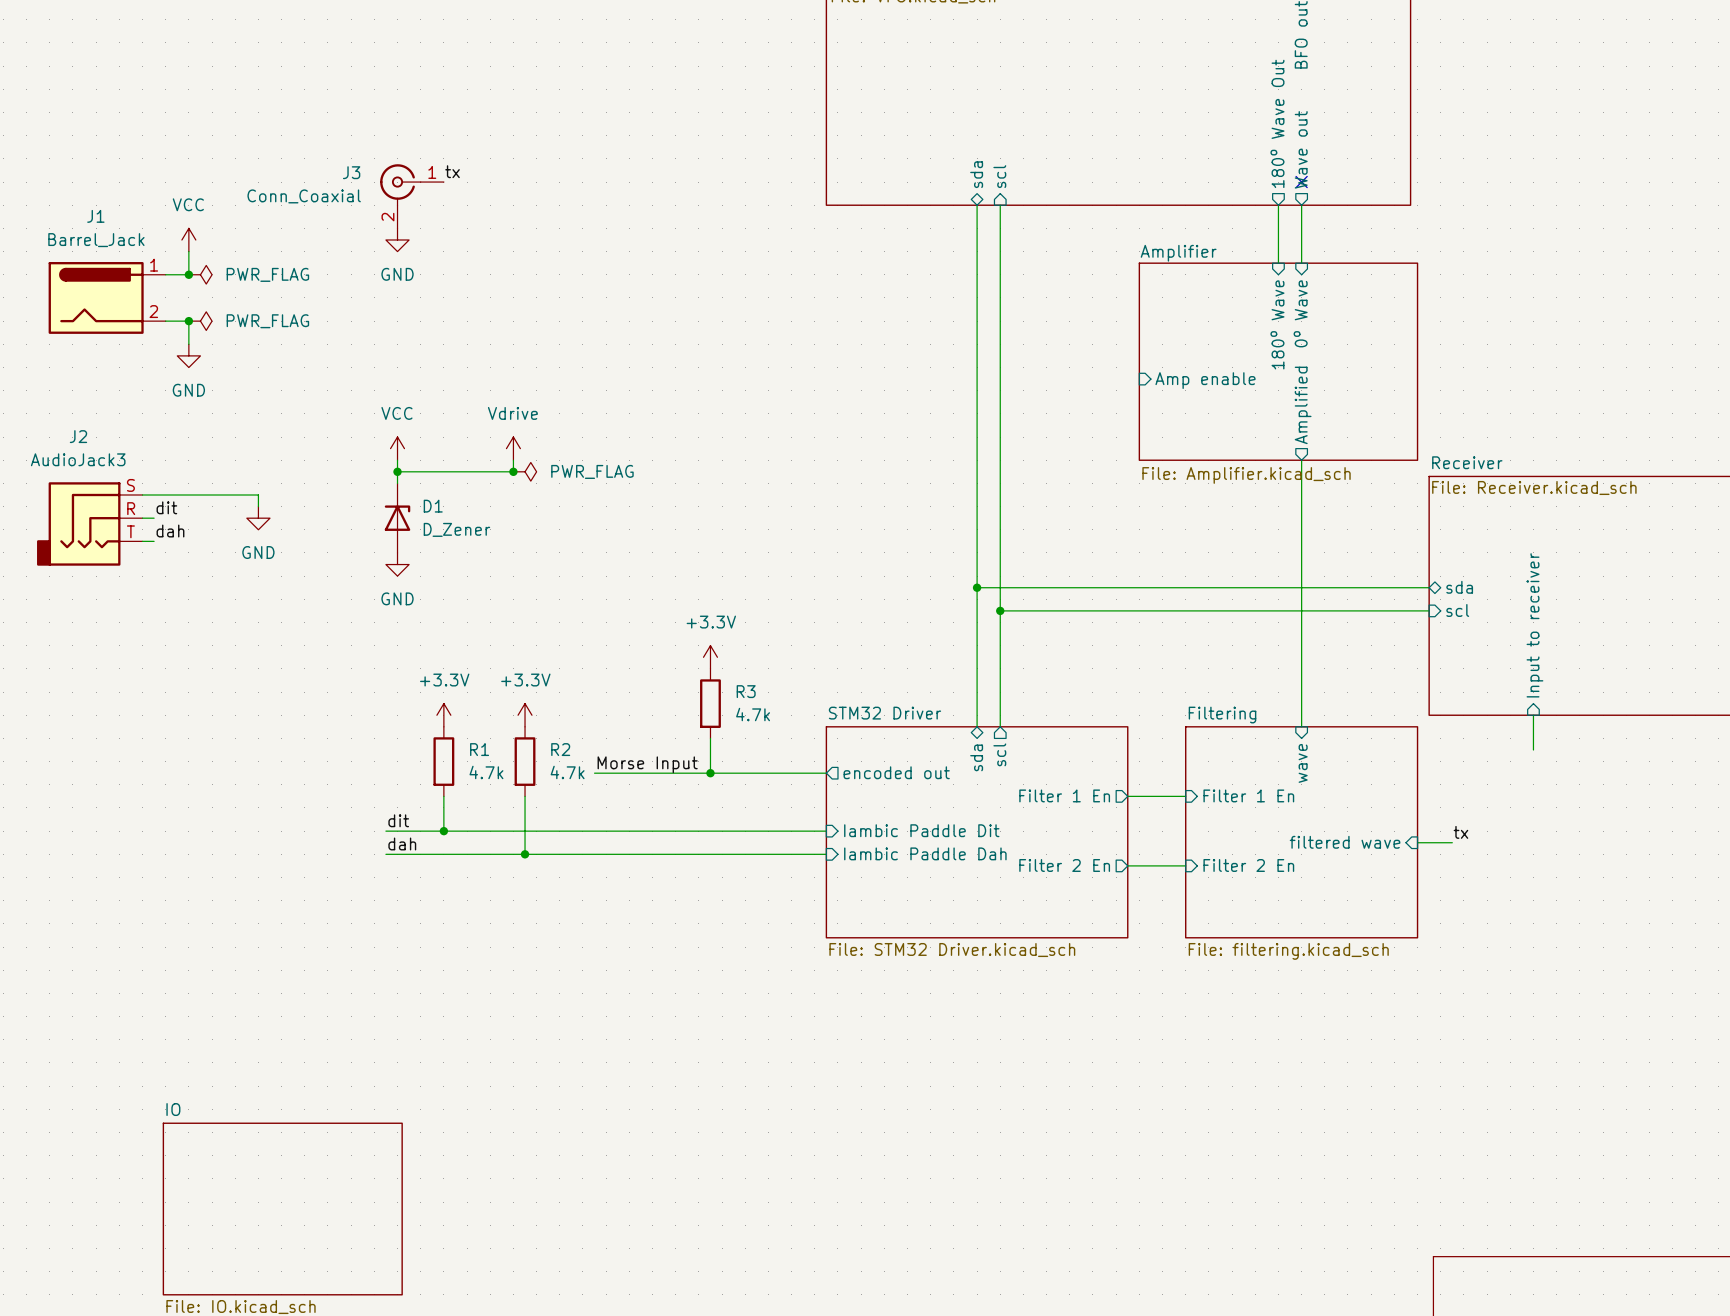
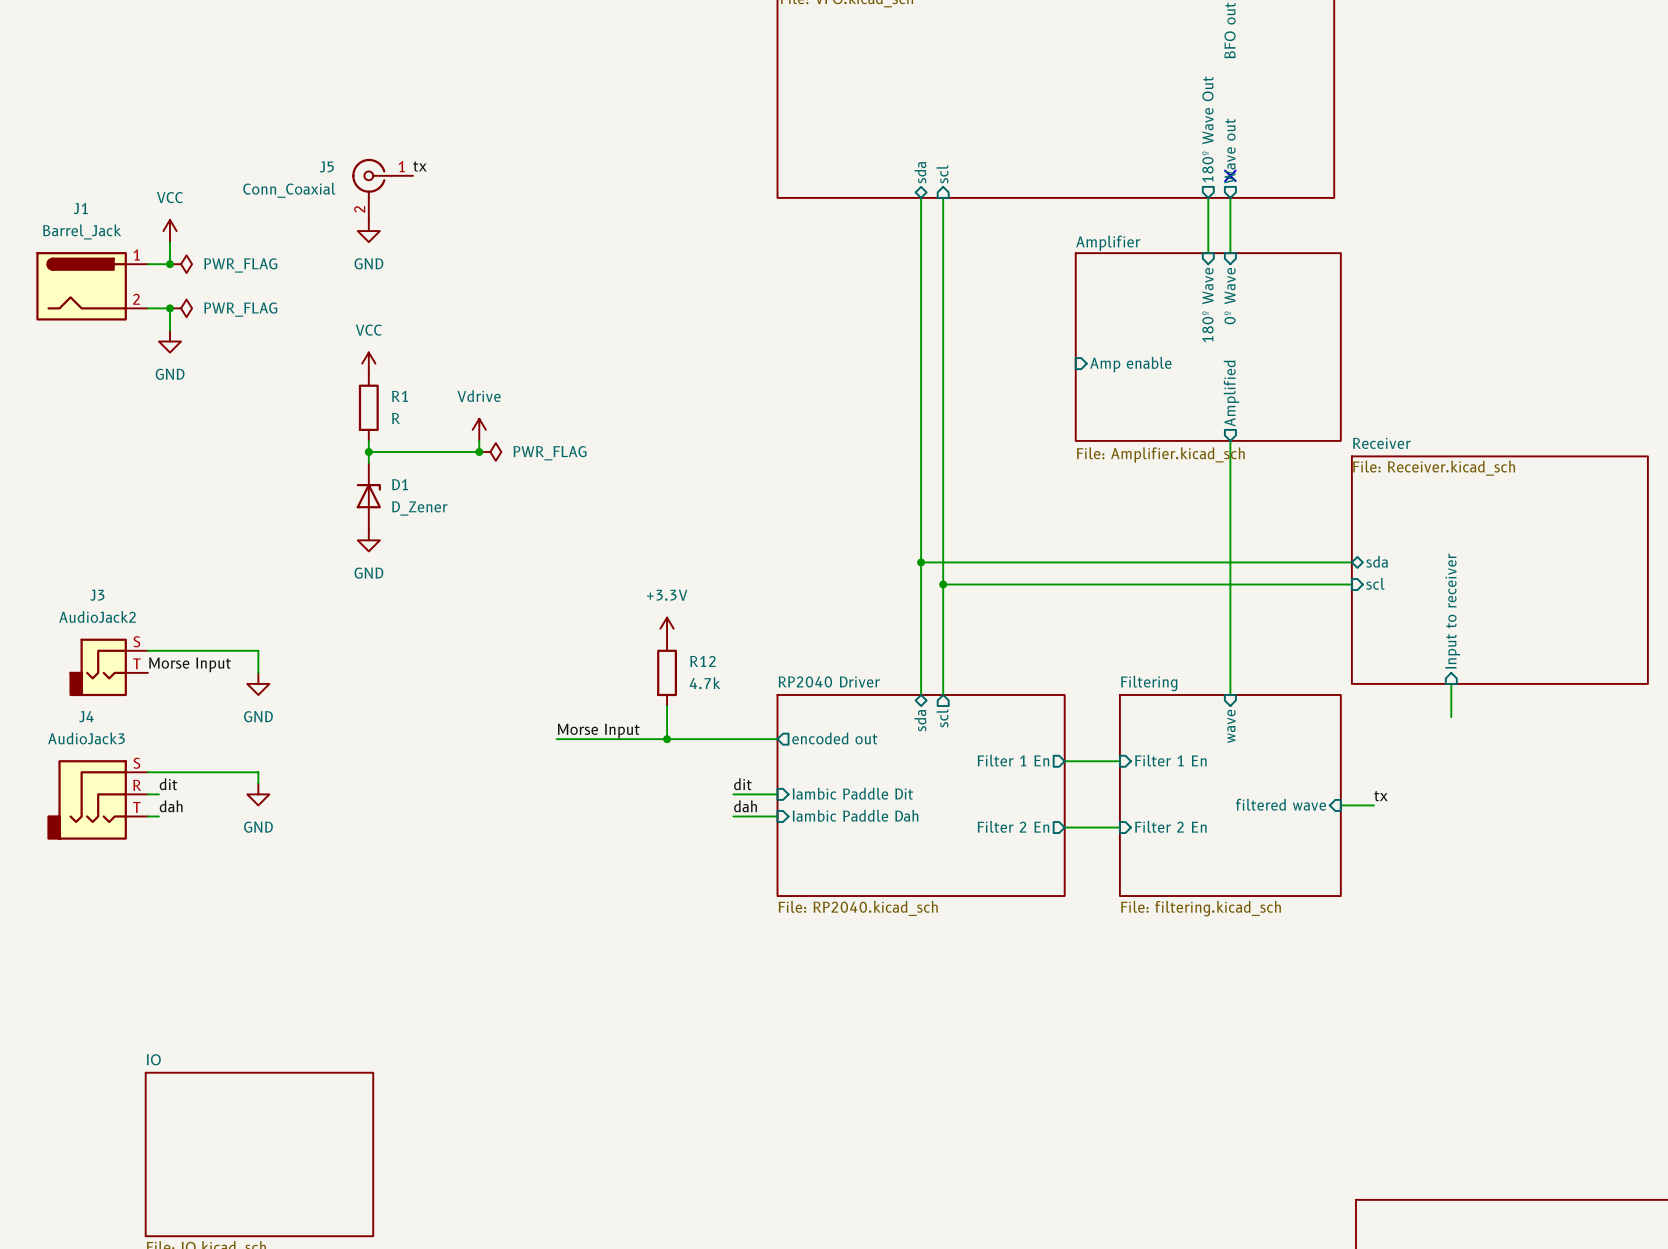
J3 name: J3 (351, 172) -> J5 (326, 166)
power symbol position: VCC (397, 448) -> VCC (368, 363)
wire: (142, 495) (258, 495) (258, 506) -> none
label: dit (166, 507) -> none
wire: (142, 518) (154, 518) -> none
power symbol: GND (258, 518) -> none
J2: AudioJack3 (89, 523) -> none
label: dah (170, 531) -> none
wire: (142, 541) (154, 541) -> none
wire: none -> (147, 650) (258, 650) (258, 672)
R3 name: R3 (746, 691) -> R12 (702, 661)
label: none -> Morse Input (190, 664)
J3: none -> AudioJack2 (108, 667)
sheet STM32 Driver name: STM32 Driver (884, 713) -> RP2040 Driver (829, 681)
power symbol: none -> GND (258, 683)
power symbol: +3.3V (443, 715) -> none
power symbol: +3.3V (525, 715) -> none
R1 position: (443, 761) -> (368, 407)
R2: 4.7k (525, 761) -> none
R1 value: 4.7k (486, 772) -> R (395, 418)
wire: (443, 796) (443, 831) -> none
wire: (525, 796) (525, 854) -> none
wire: none -> (147, 772) (258, 772) (258, 783)
label: none -> dit (168, 784)
label: dit (398, 820) -> none
label: none -> dit (742, 784)
wire: none -> (147, 794) (158, 794)
power symbol: none -> GND (258, 794)
wire: (385, 831) (780, 831) -> none
junction: (443, 831) -> none
J4: none -> AudioJack3 (97, 799)
label: none -> dah (171, 806)
label: dah (402, 843) -> none
label: none -> dah (745, 806)
wire: none -> (147, 816) (158, 816)
wire: (385, 854) (780, 854) -> none
junction: (525, 854) -> none
sheet STM32 Driver value: File: STM32 Driver.kicad_sch (952, 950) -> File: RP2040.kicad_sch (858, 908)

